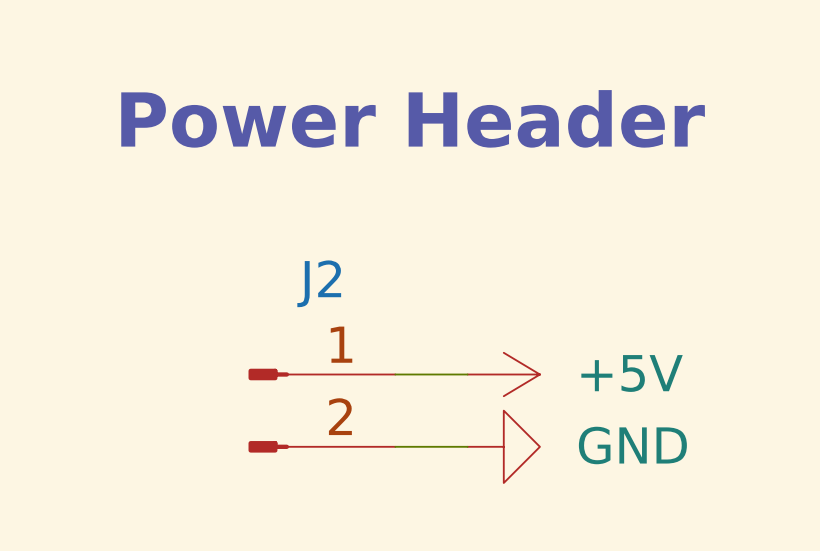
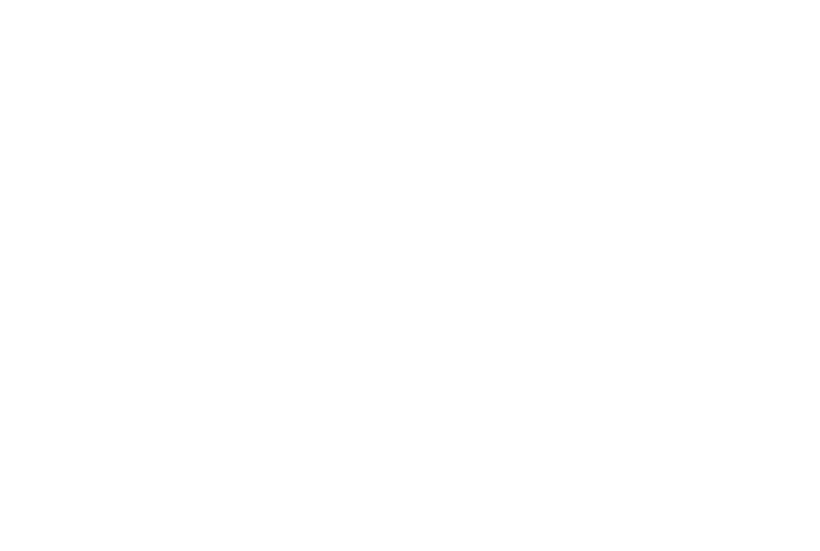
text: Power Header (413, 118) -> none
wire: (395, 374) (467, 374) -> none
power symbol: +5V (503, 374) -> none
J2: (321, 410) -> none
wire: (395, 446) (467, 446) -> none
power symbol: GND (503, 446) -> none

